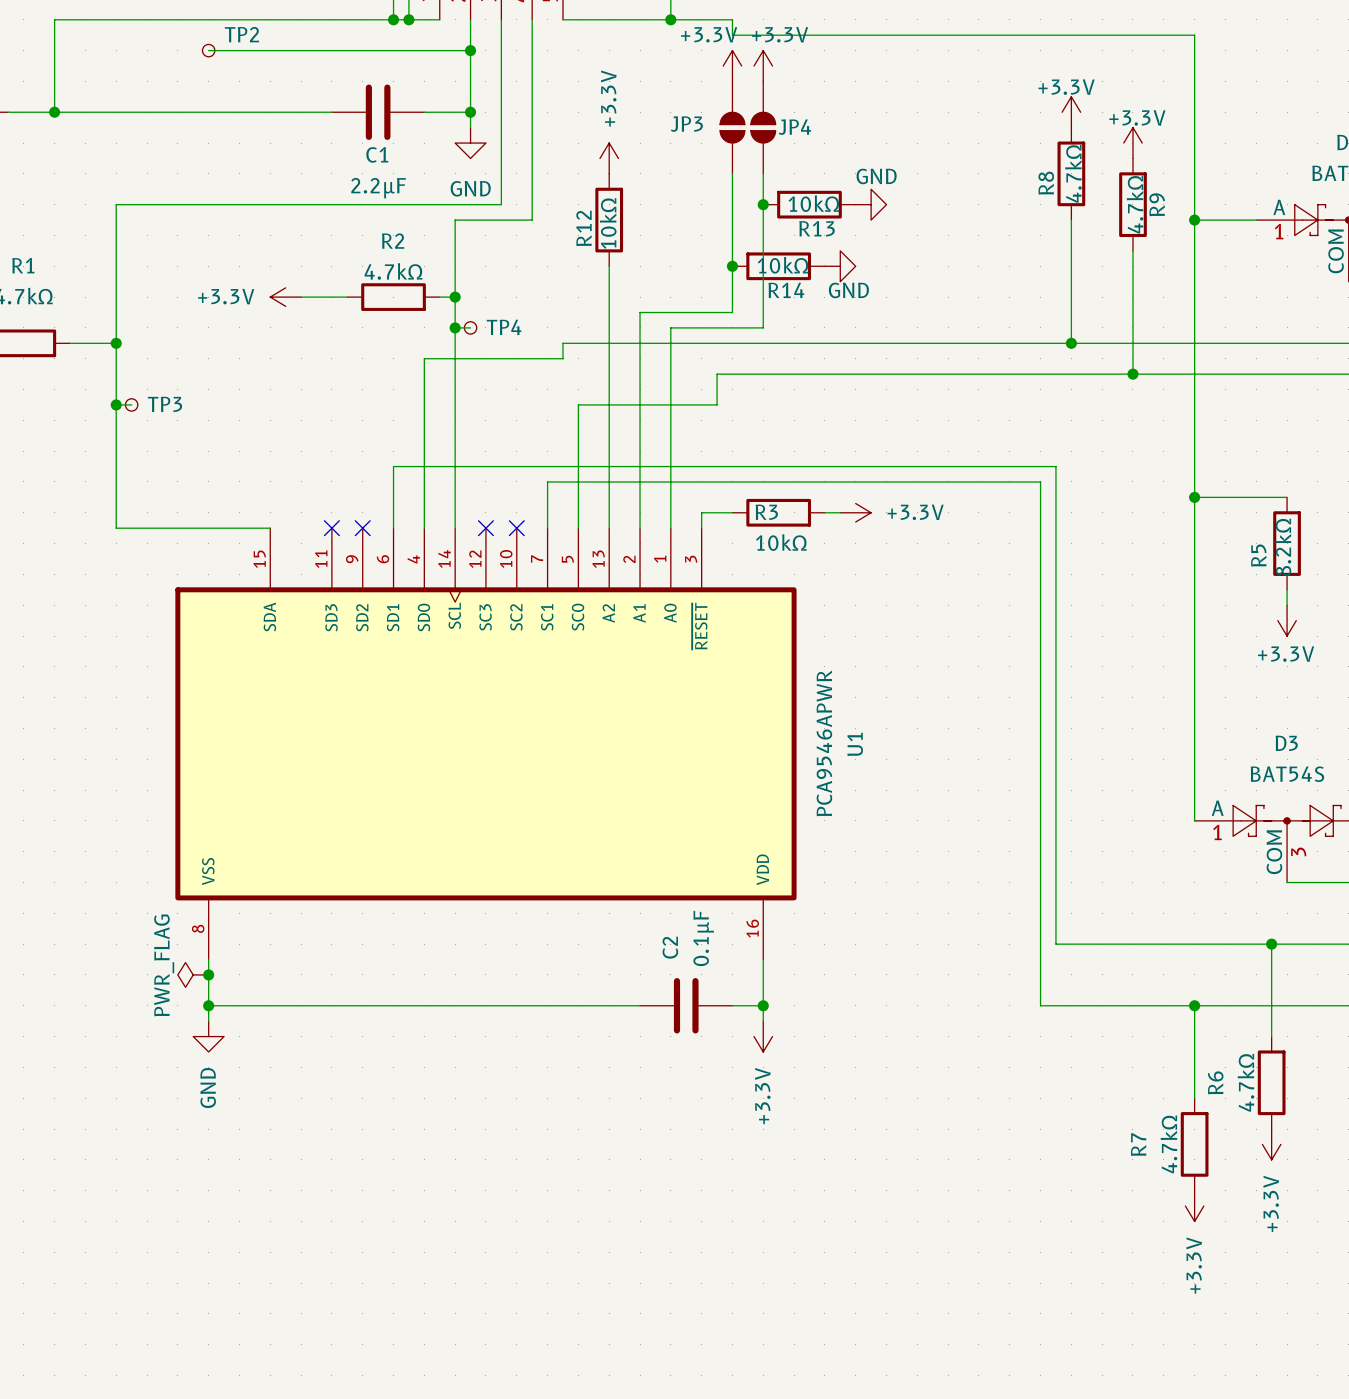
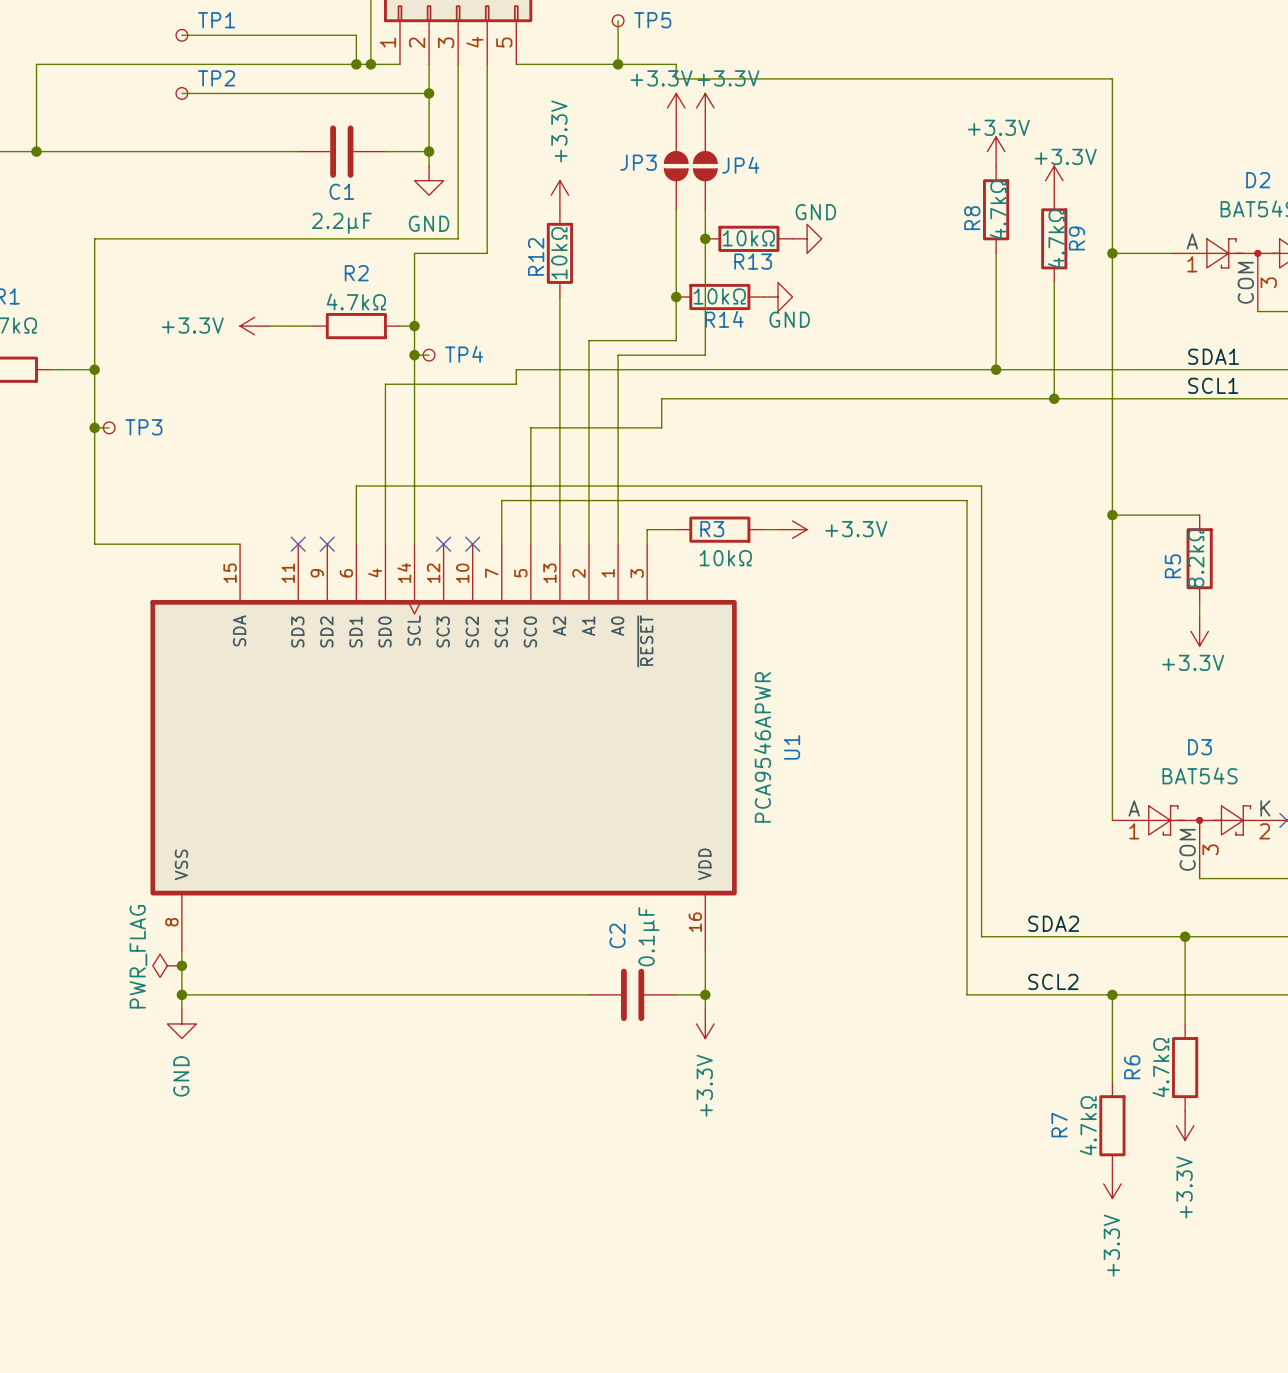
label: none -> SDA1 (1213, 356)
label: none -> SCL1 (1213, 385)
label: none -> SDA2 (1053, 923)
label: none -> SCL2 (1053, 981)

